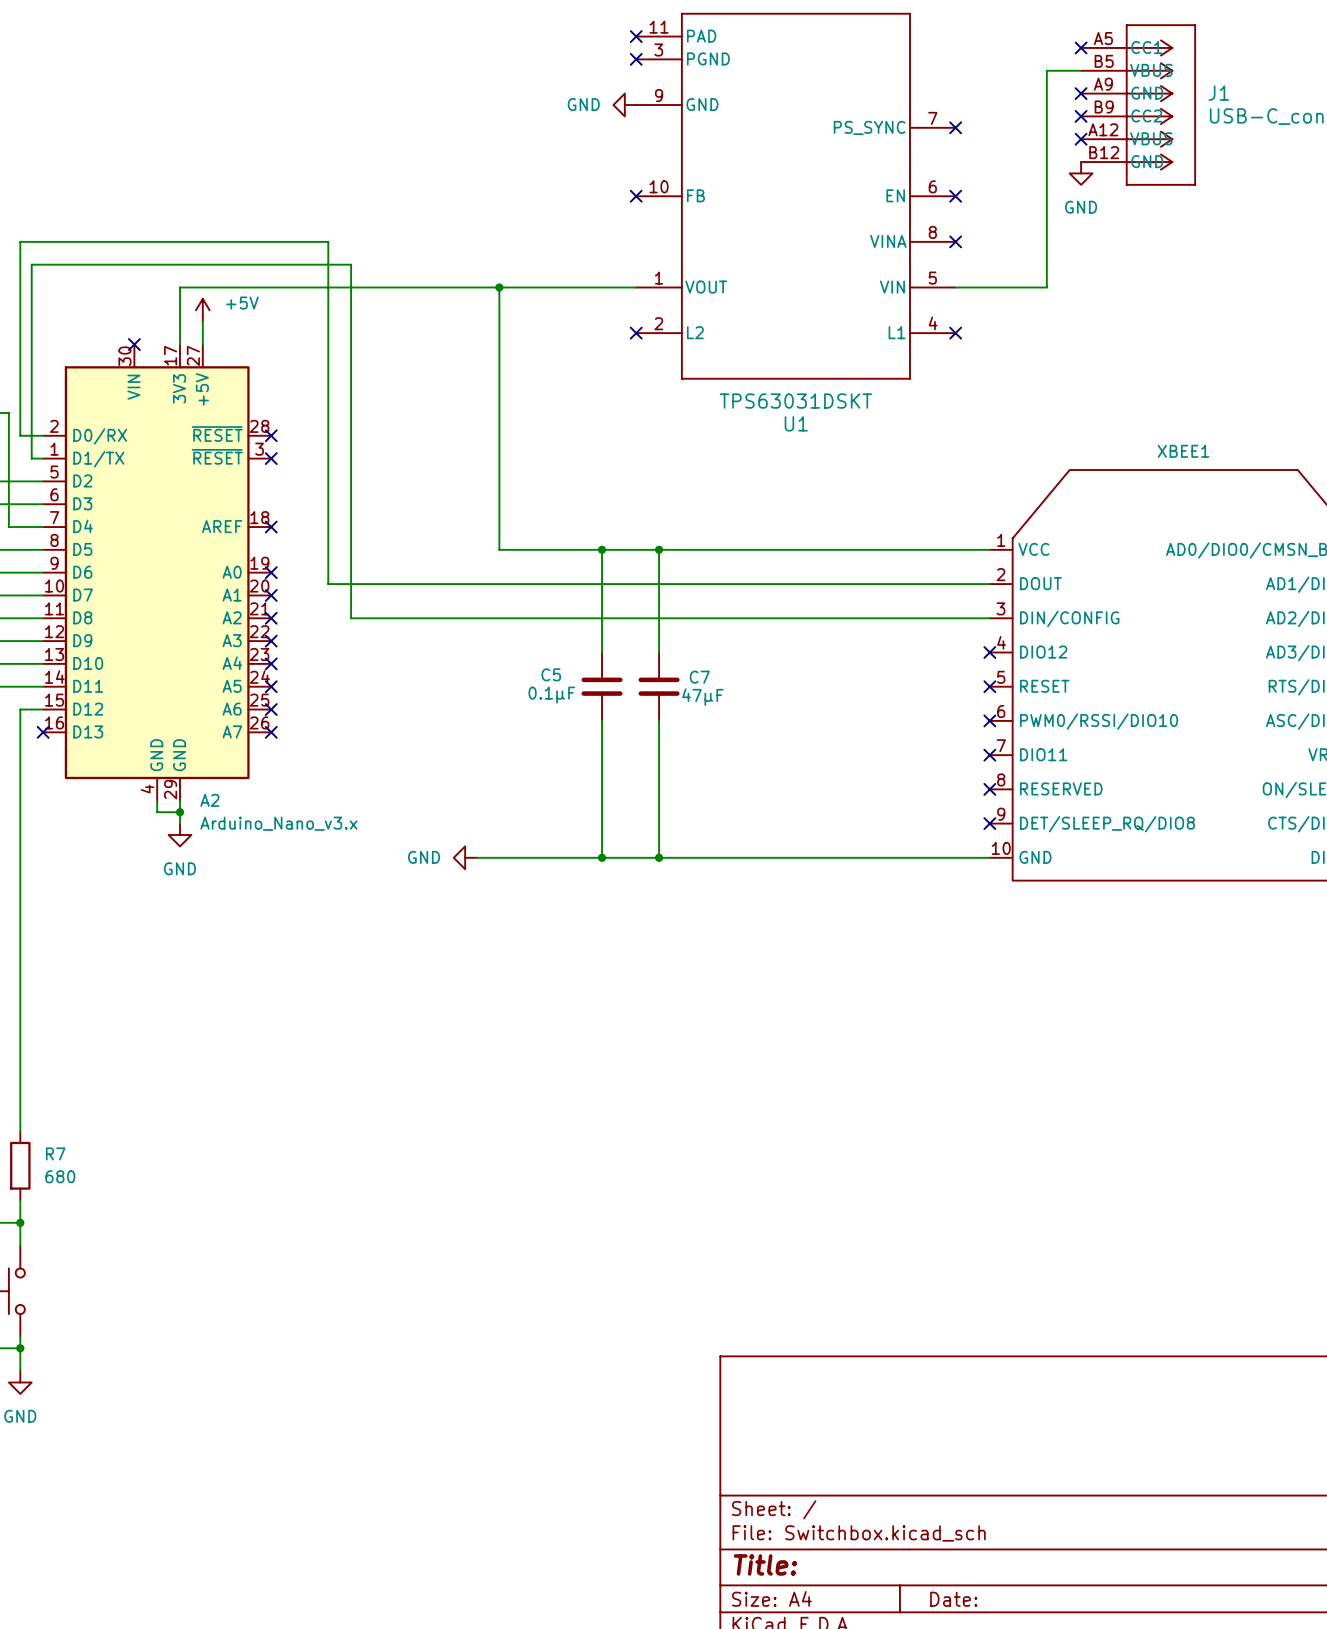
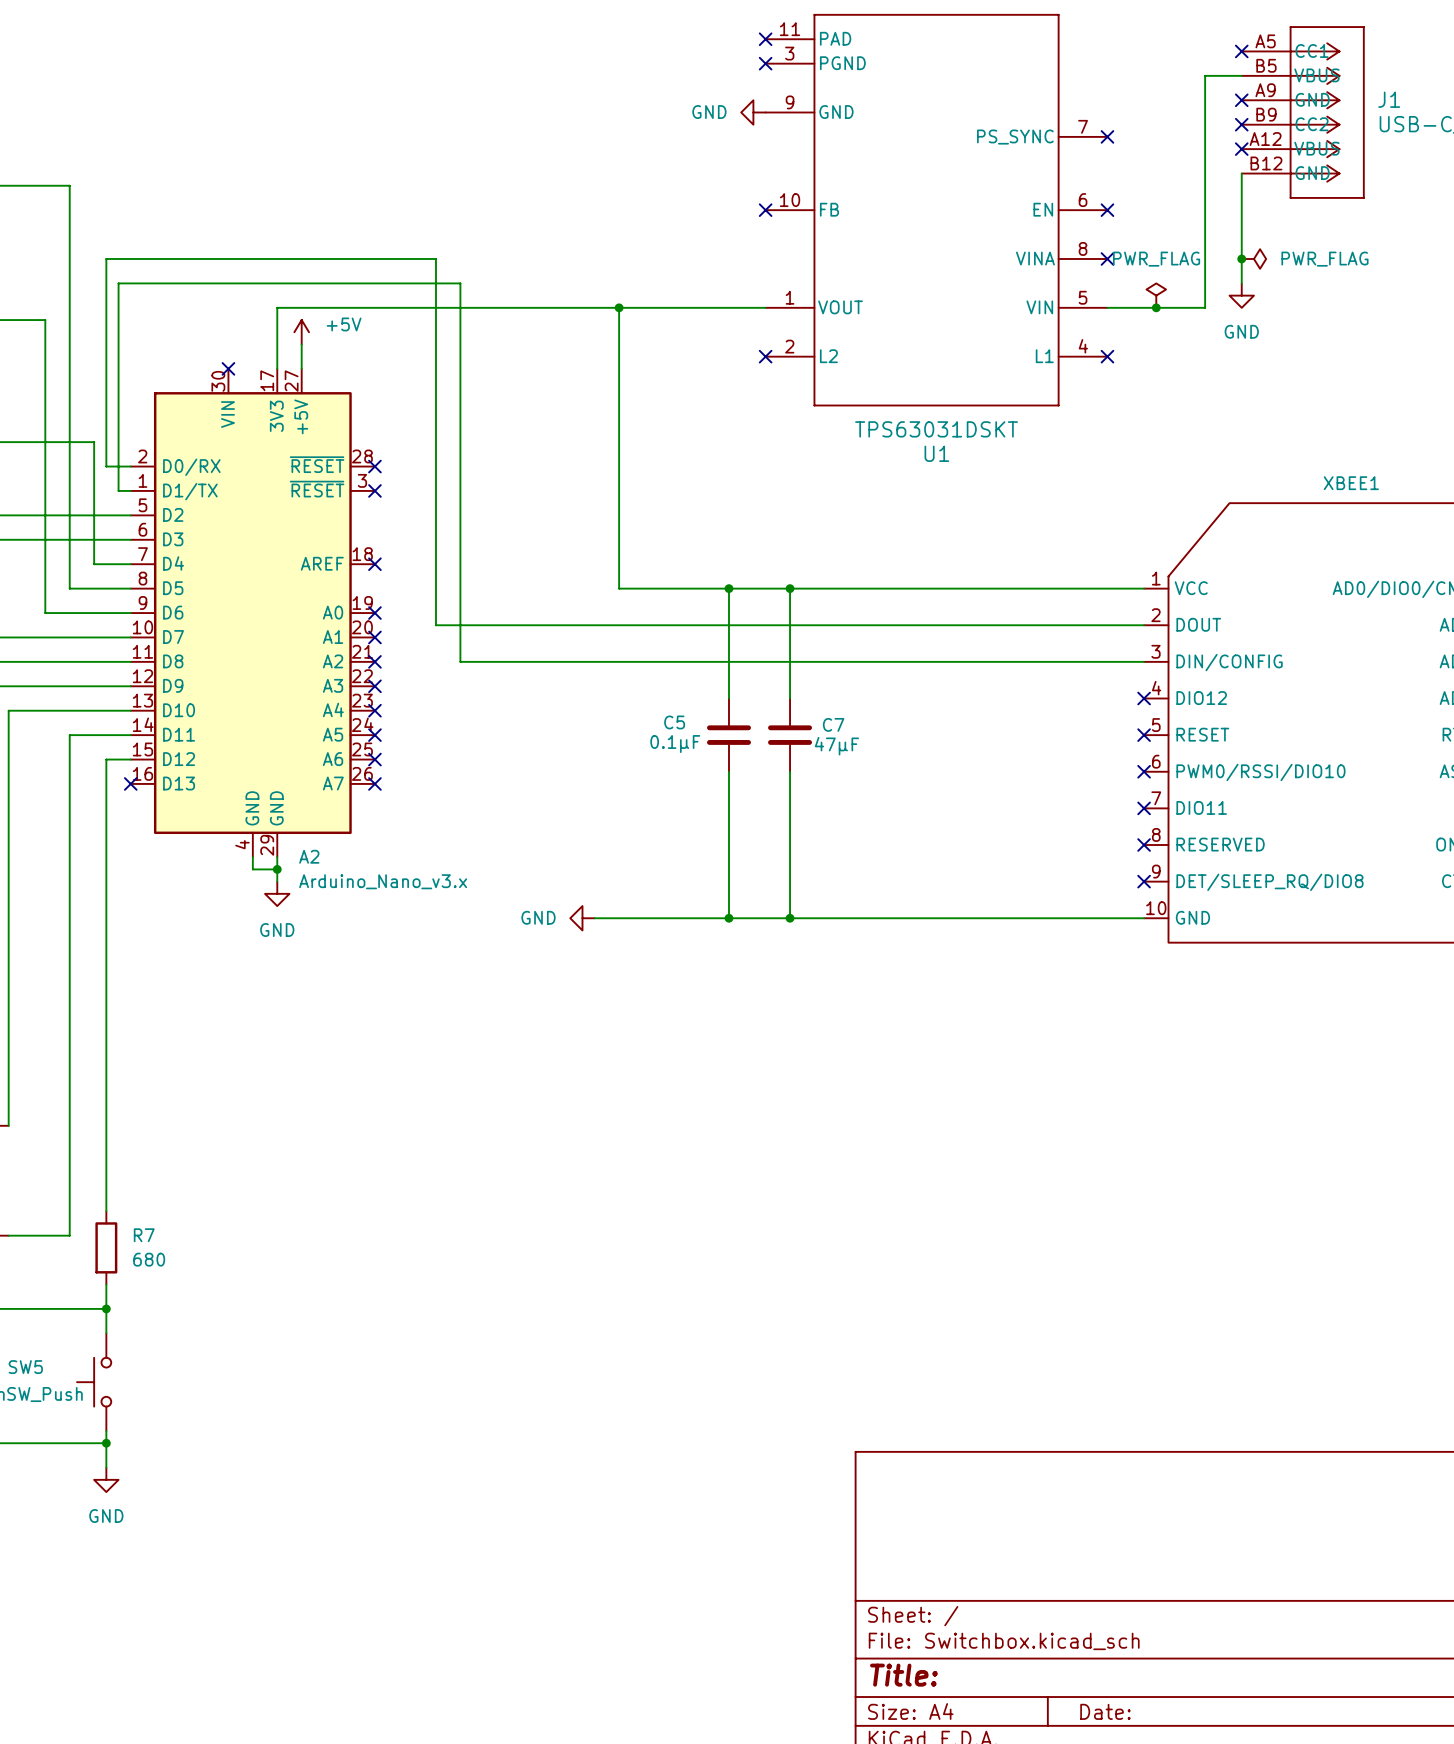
wire: none -> (1241, 173) (1241, 283)
power symbol position: GND (1081, 173) -> GND (1241, 295)
junction: none -> (1241, 258)
power symbol: none -> PWR_FLAG (1253, 258)
power symbol: none -> PWR_FLAG (1156, 295)
junction: none -> (1156, 307)

